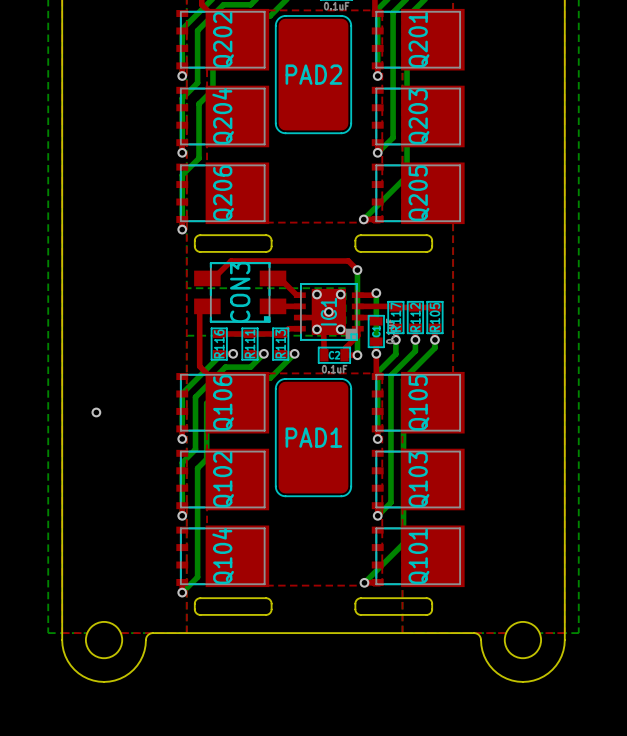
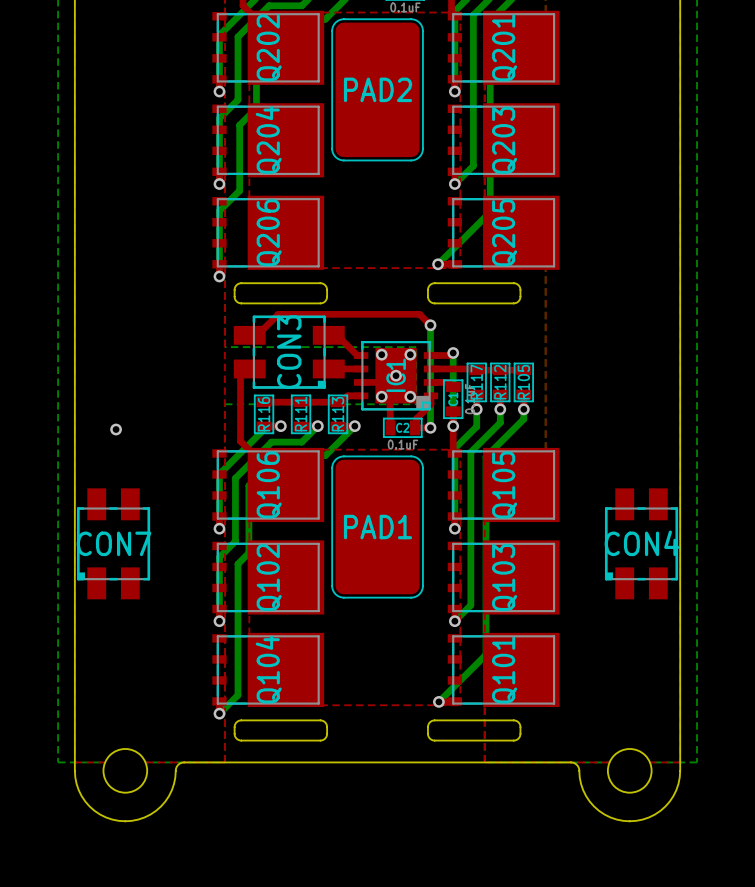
via position: (96, 412) -> (116, 429)
CON7: none -> (113, 543)
CON4: none -> (641, 543)

